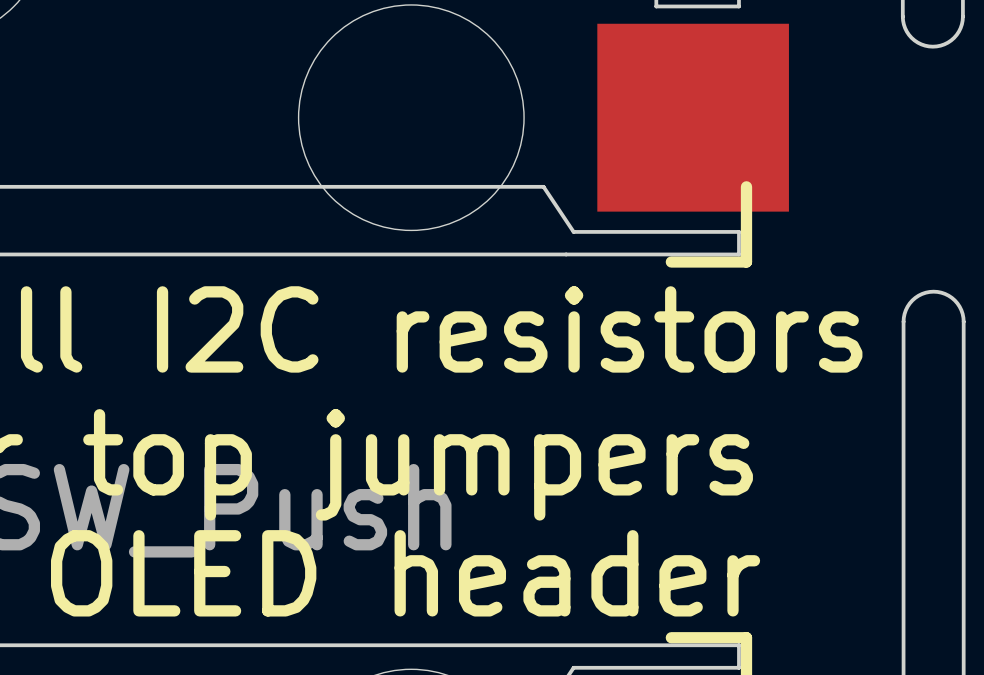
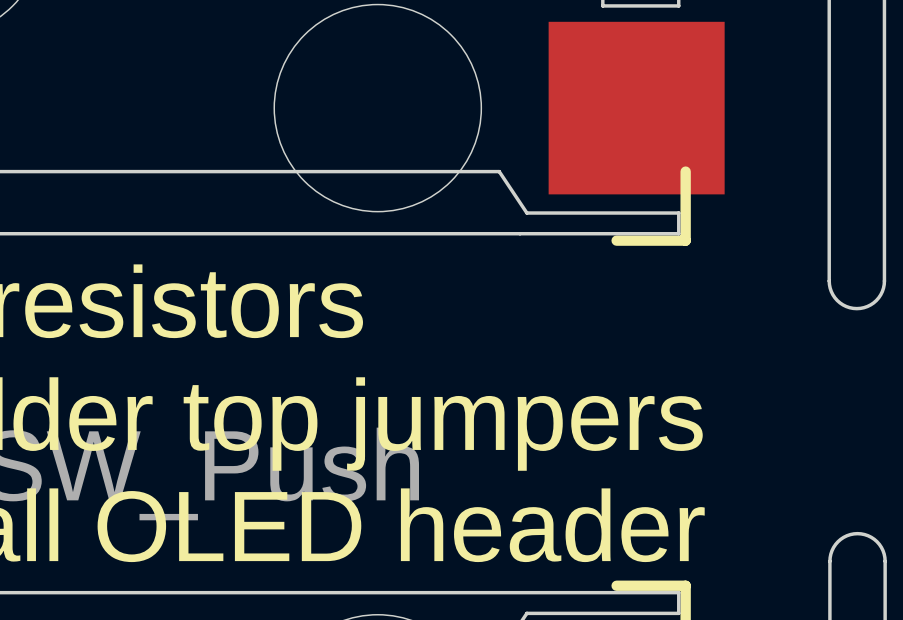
board edge: (902, 16) (905, 28) (911, 37) (921, 44) (932, 46) (944, 44) (954, 37) (960, 28) (962, 16) -> (829, 15) (829, 284) (837, 300) (846, 306) (856, 308) (867, 306) (876, 300) (884, 284) (884, 15)
board edge: (903, 611) (903, 317) (907, 306) (912, 300) (922, 293) (933, 291) (945, 293) (954, 300) (959, 306) (963, 317) (963, 611) -> (829, 561) (832, 550) (838, 541) (846, 535) (857, 533) (868, 535) (877, 541) (883, 550) (885, 561)

